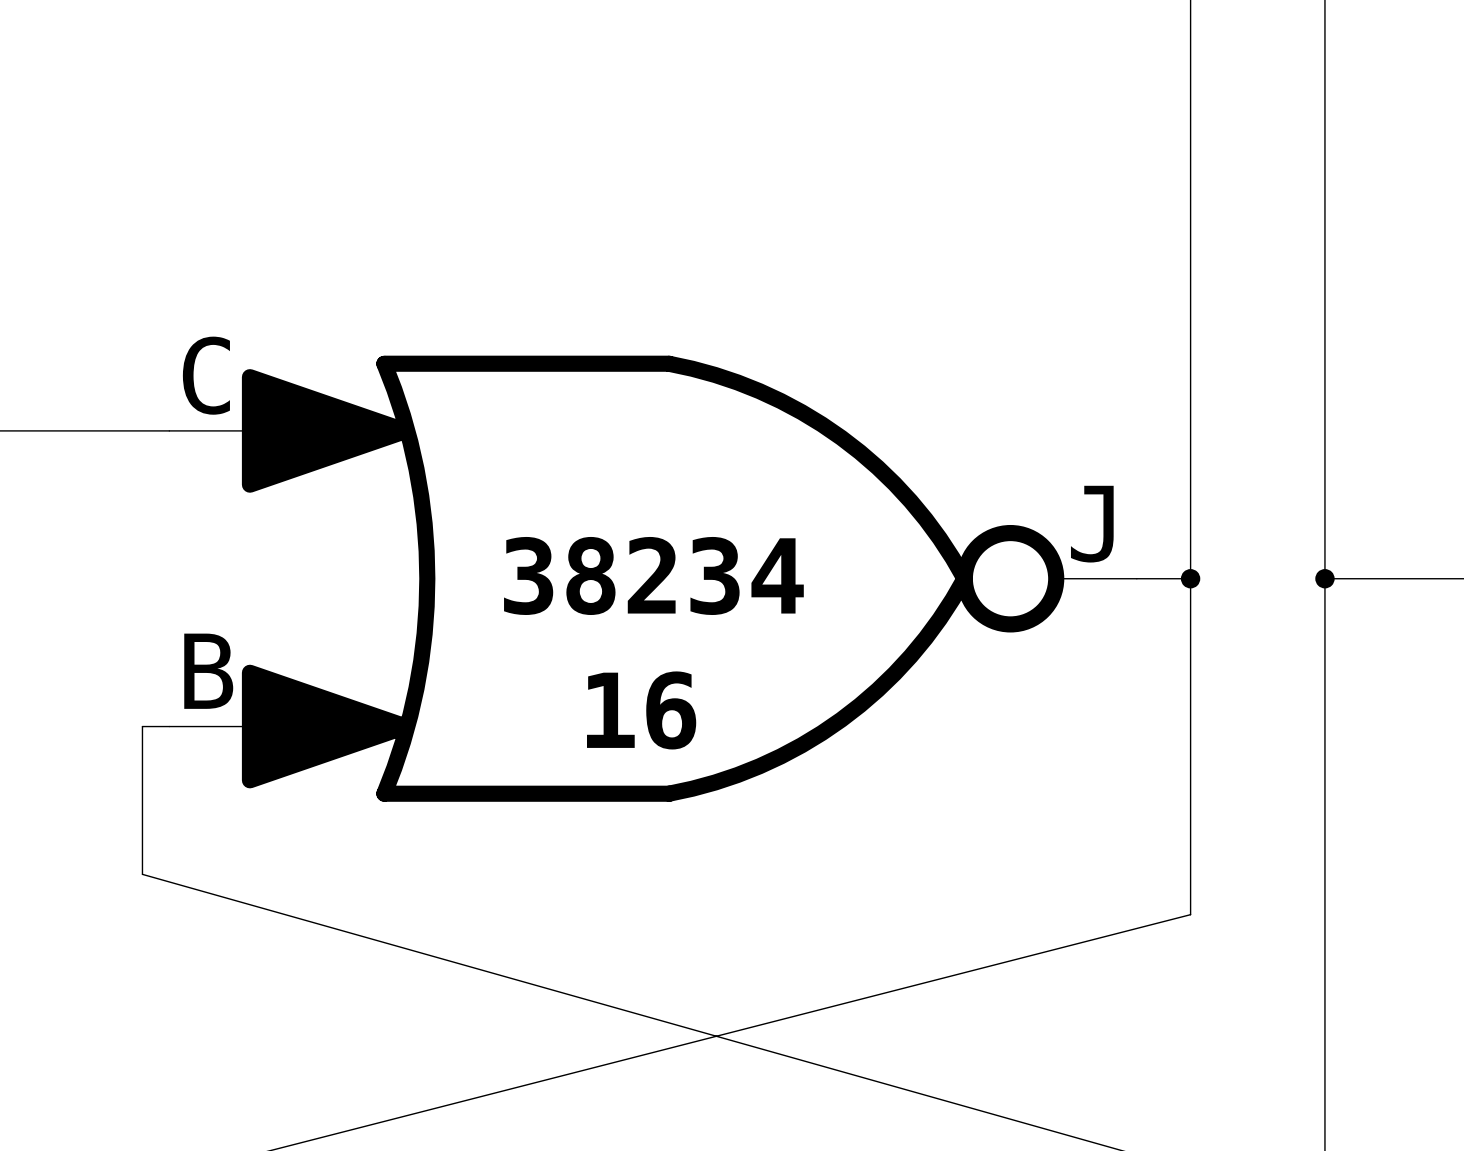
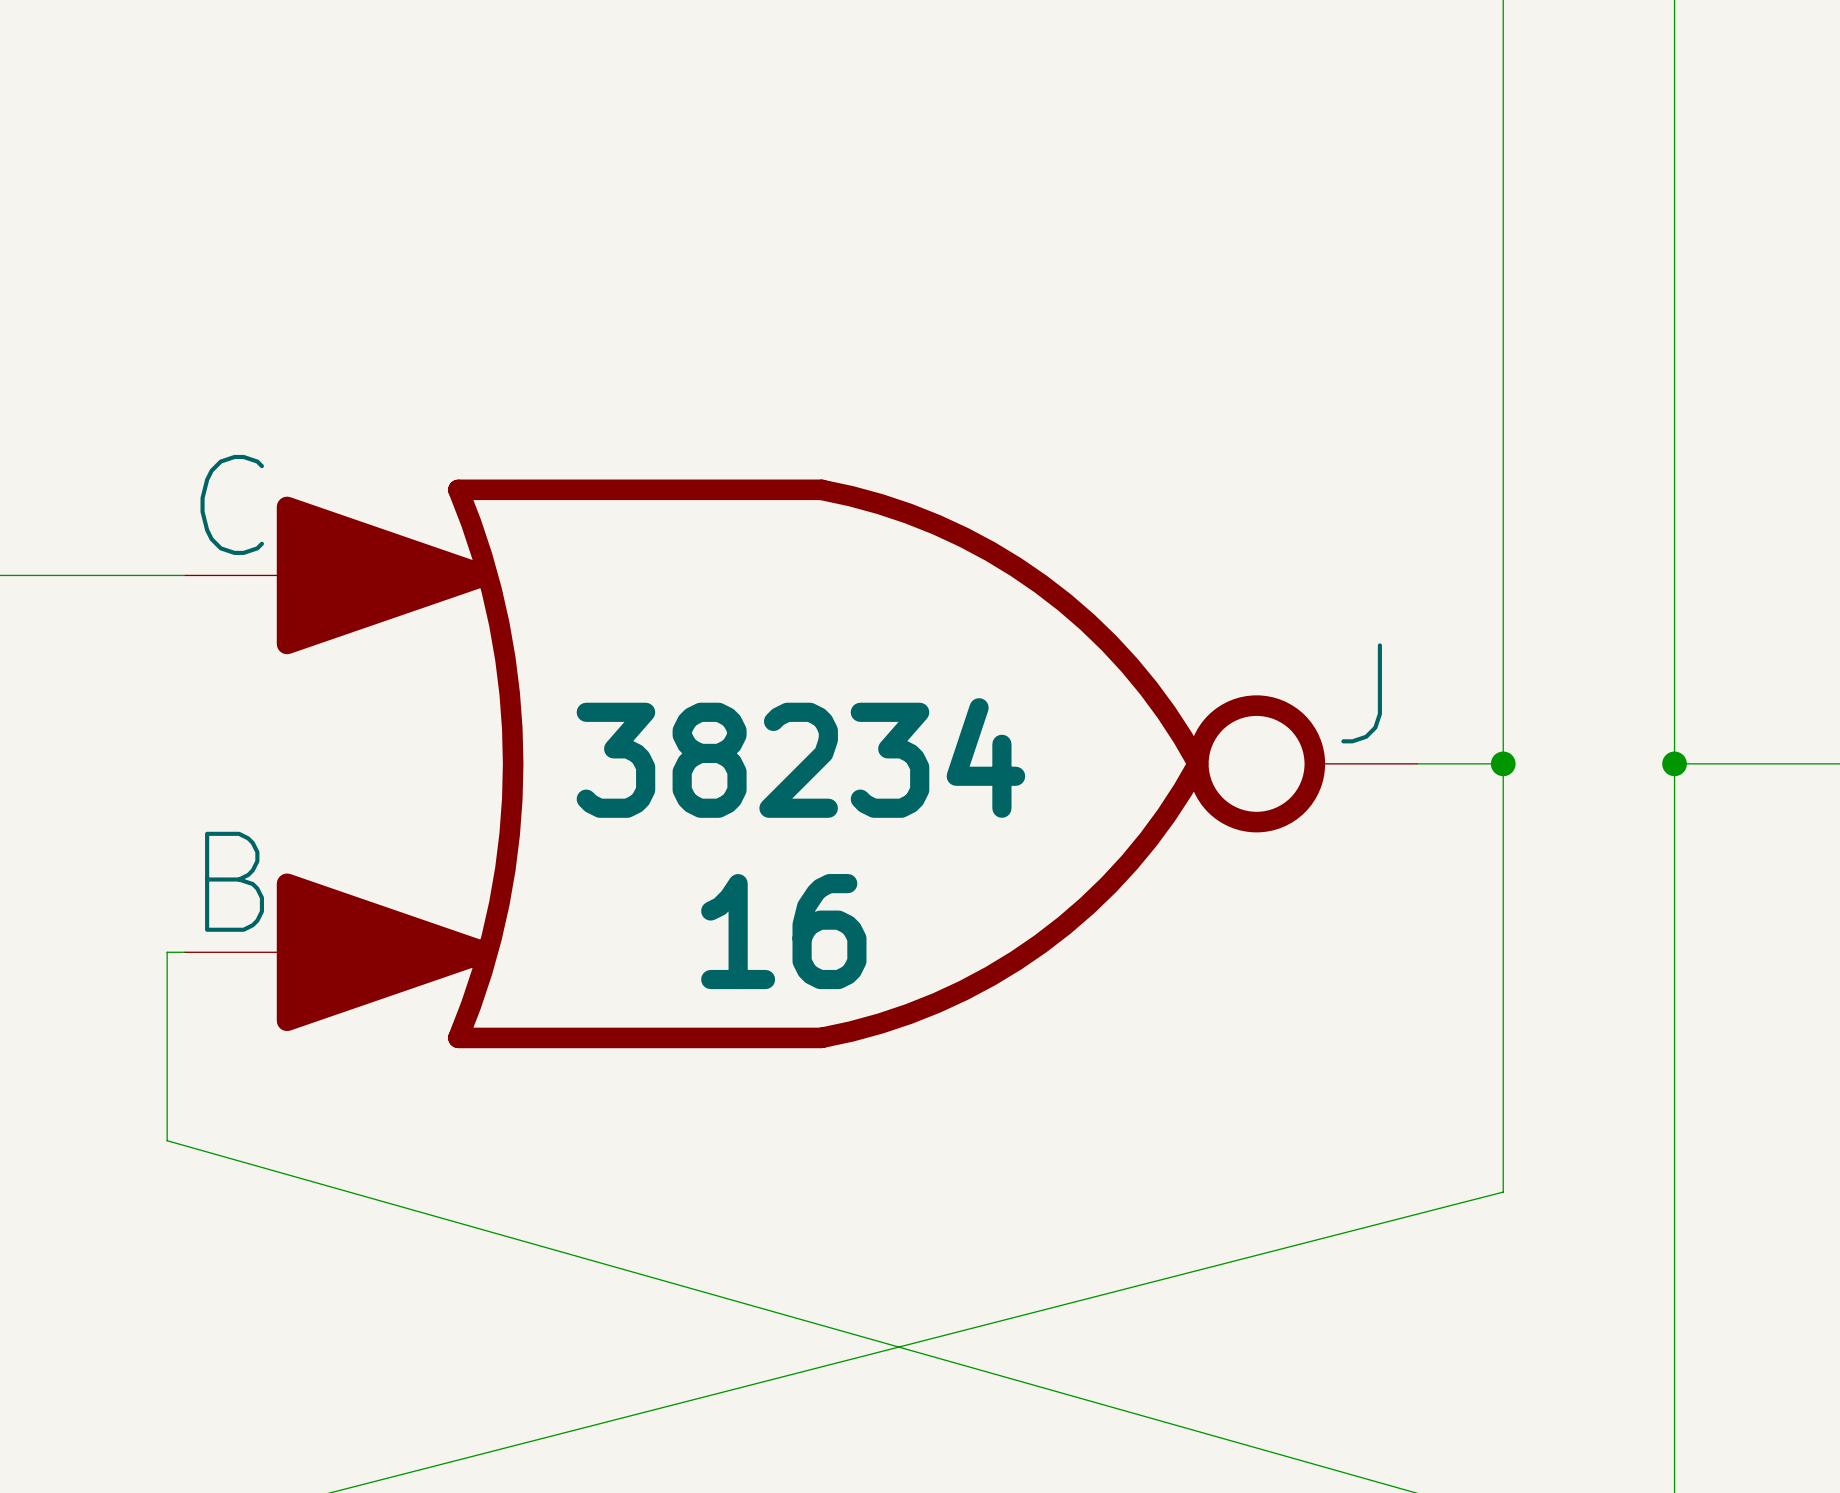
part position: (653, 578) -> (800, 763)

